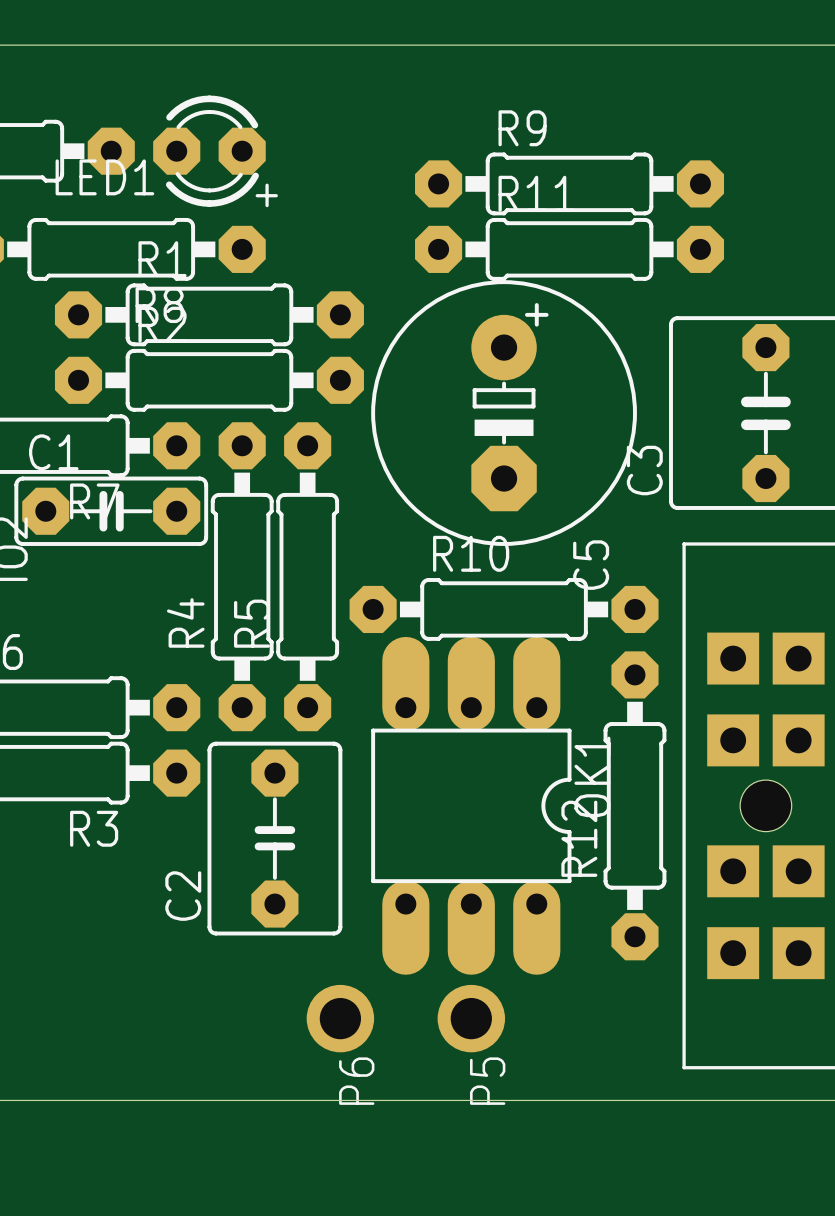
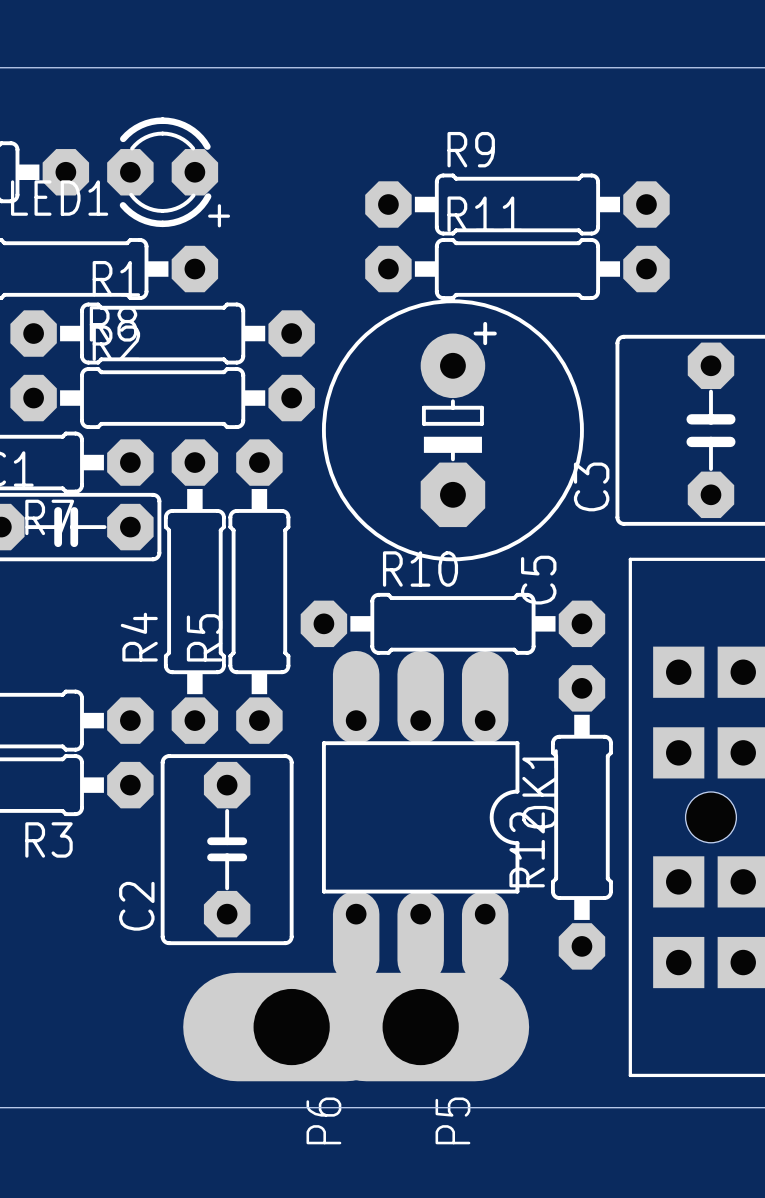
P6 footprint: [306, 984, 375, 1053] -> [183, 972, 401, 1082]
P5 footprint: [437, 984, 506, 1053] -> [312, 972, 530, 1082]

